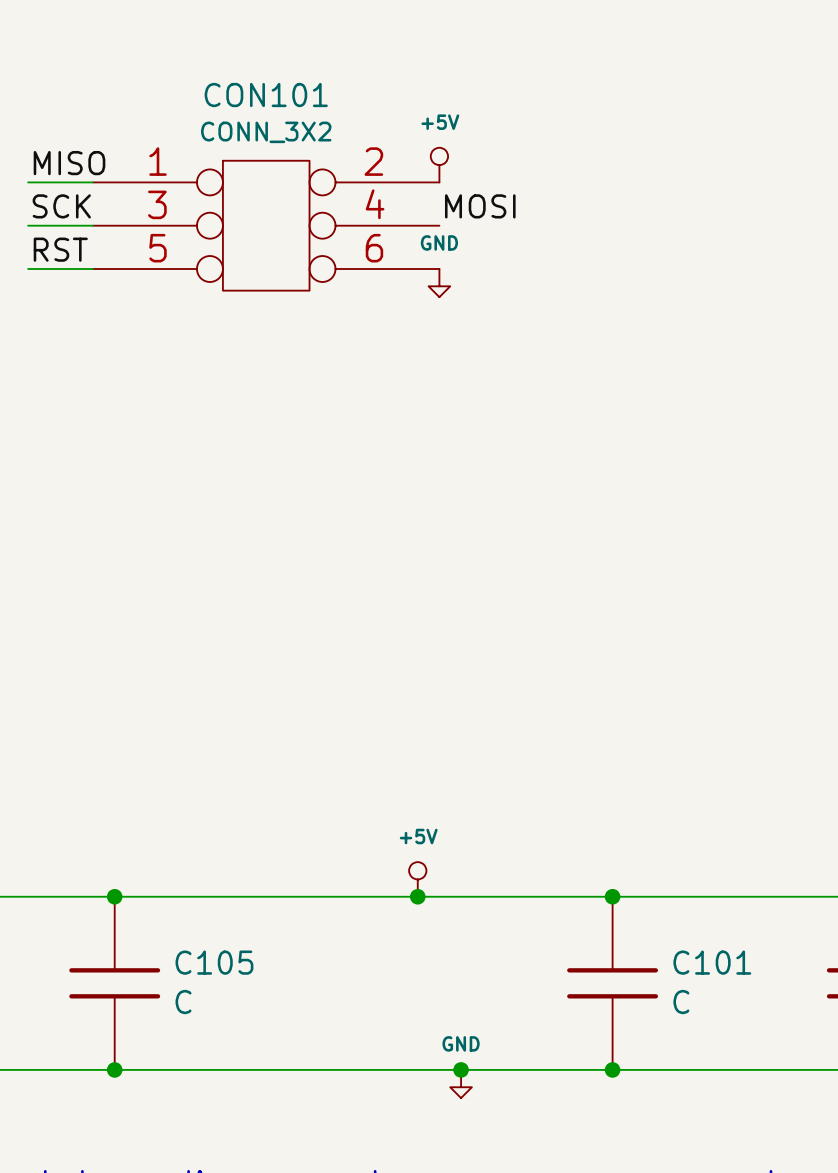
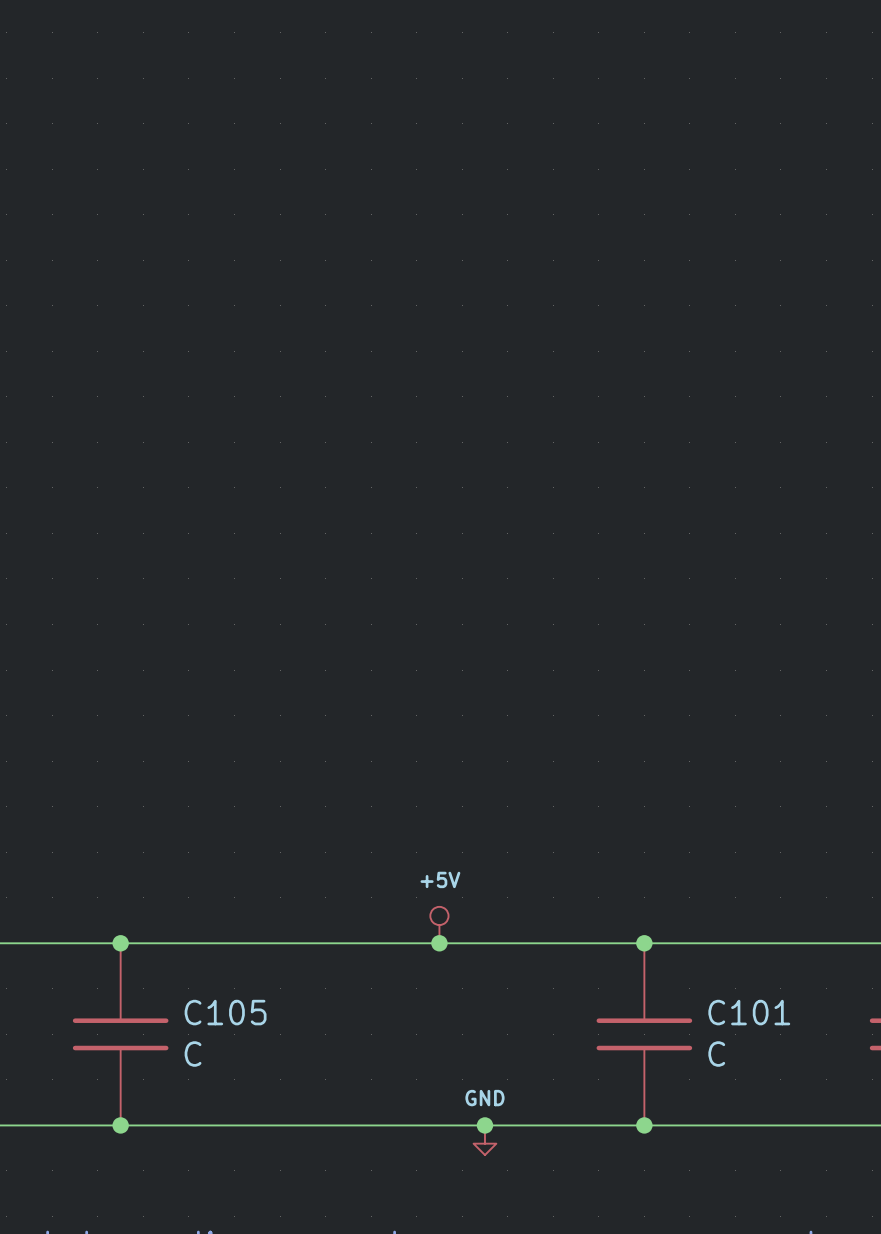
label: MISO (69, 163) -> none
power symbol: +5V (439, 165) -> none
wire: (28, 182) (93, 182) -> none
label: SCK (61, 206) -> none
label: MOSI (480, 206) -> none
wire: (28, 225) (93, 225) -> none
CON101: CONN_3X2 (266, 225) -> none
label: RST (60, 249) -> none
wire: (28, 268) (93, 268) -> none
power symbol: GND (439, 283) -> none

